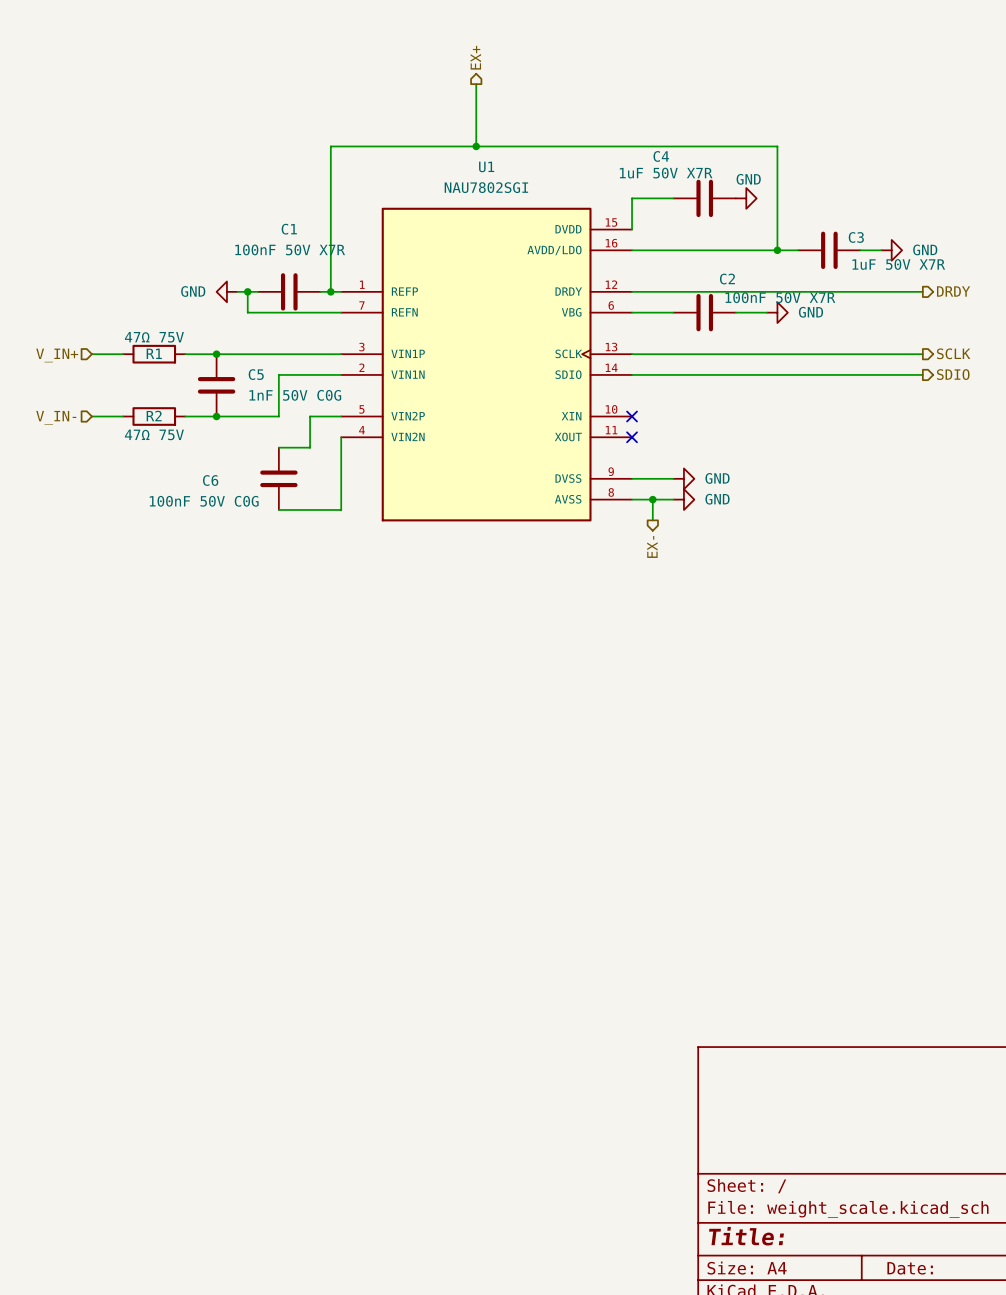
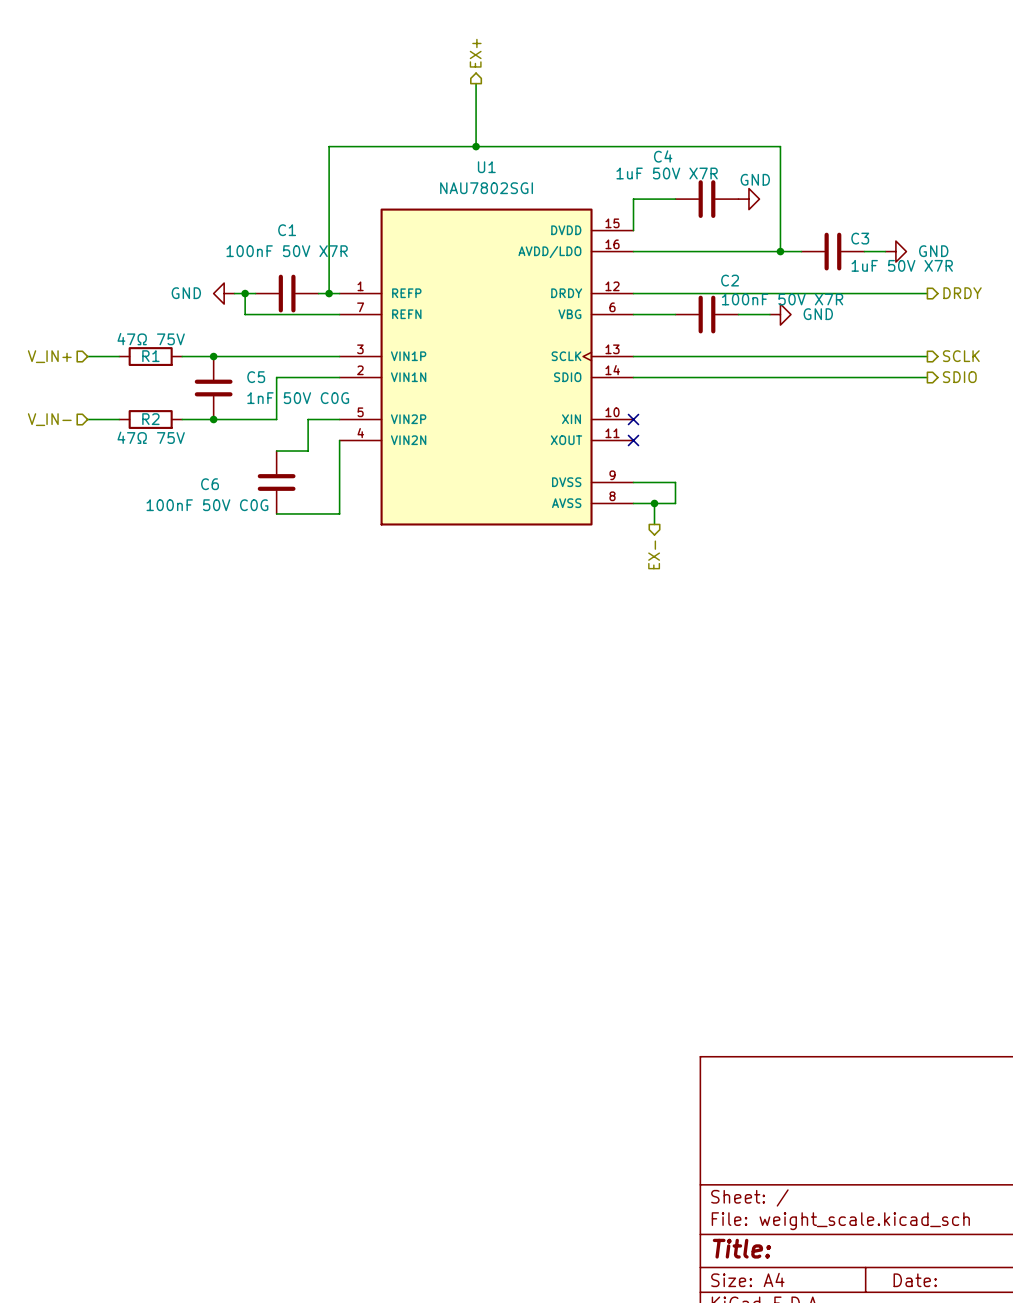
wire: none -> (675, 482) (675, 503)
power symbol: GND (683, 478) -> none
power symbol: GND (683, 499) -> none

